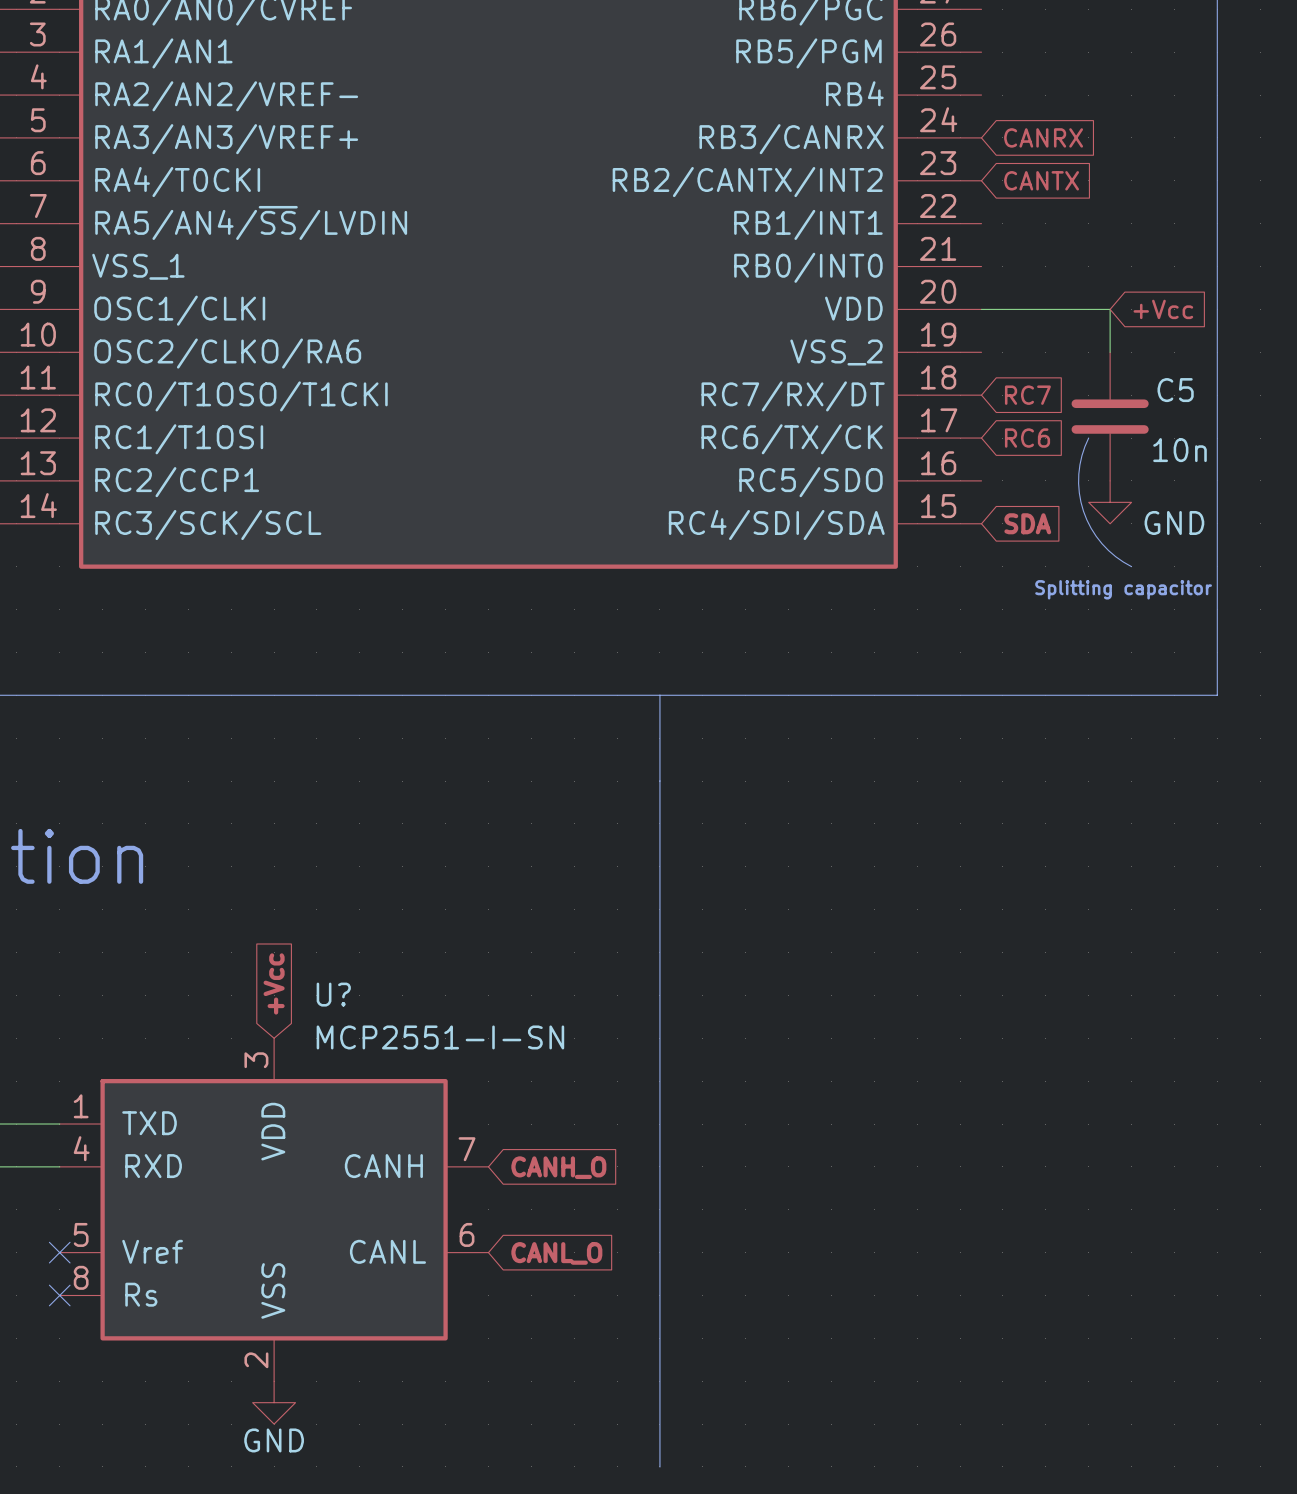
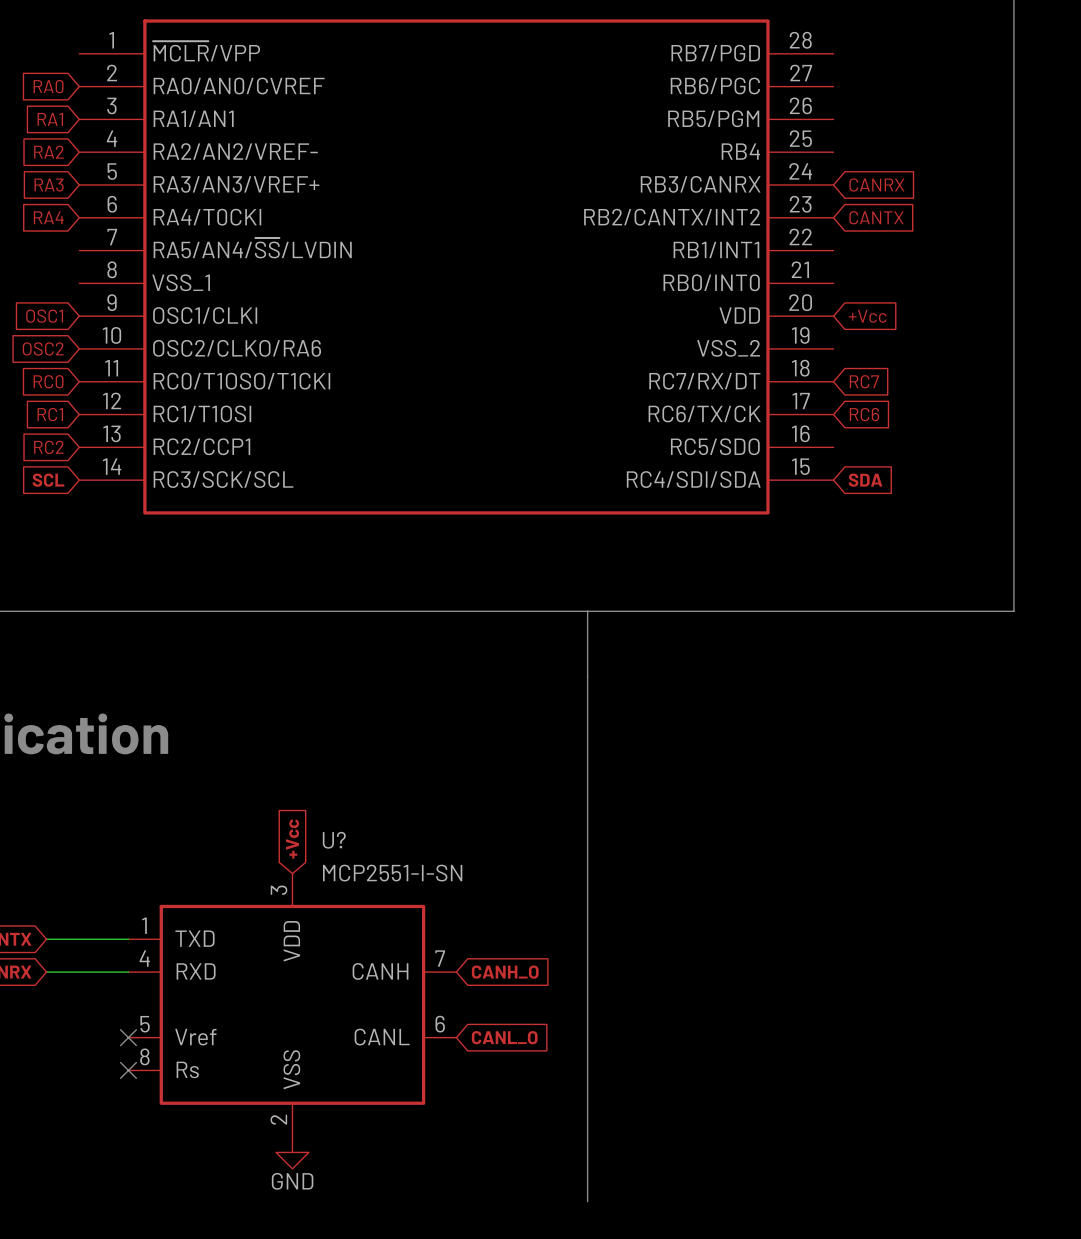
wire: (981, 309) (1110, 309) (1110, 352) -> none
global label position: +Vcc (1163, 309) -> +Vcc (867, 316)
C5: 10n (1110, 416) -> none
line: (1088, 438) (1081, 455) (1078, 474) (1079, 492) (1083, 511) (1091, 528) (1102, 543) (1115, 556) (1131, 566) -> none
power symbol: GND (1110, 502) -> none
text: Splitting capacitor (1123, 589) -> none

